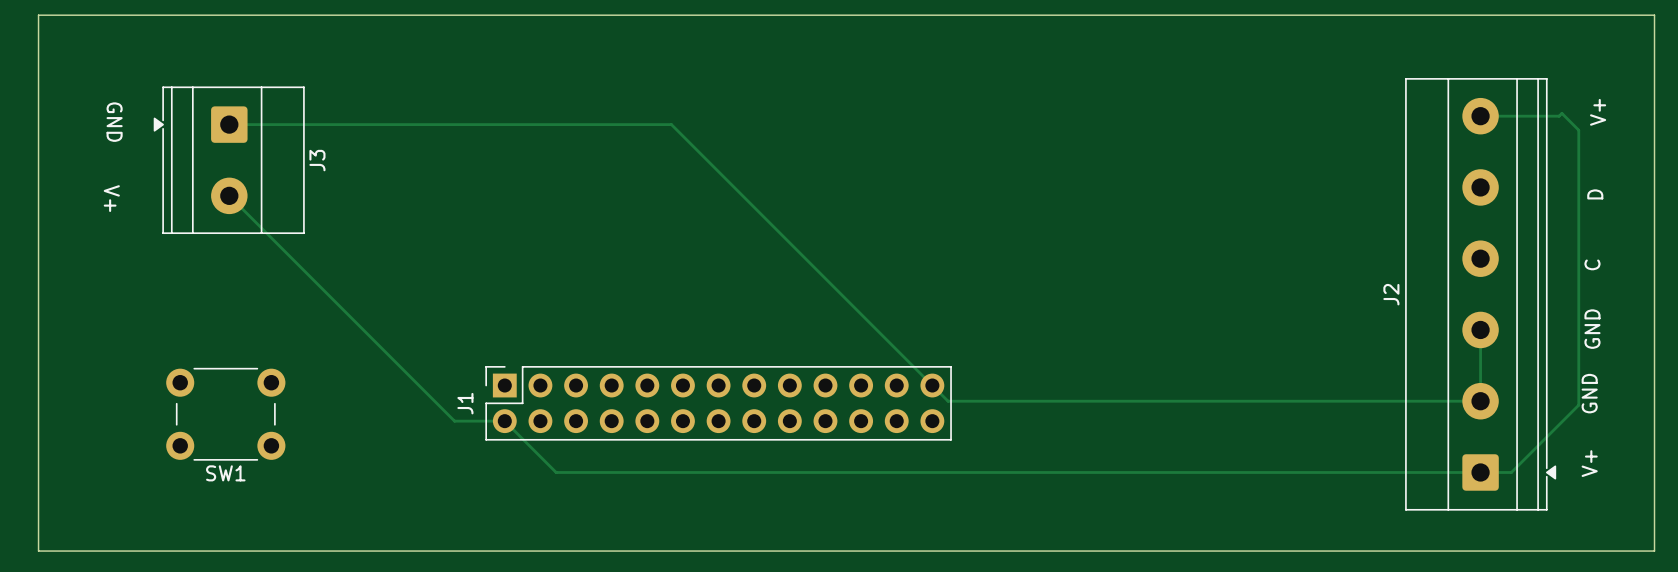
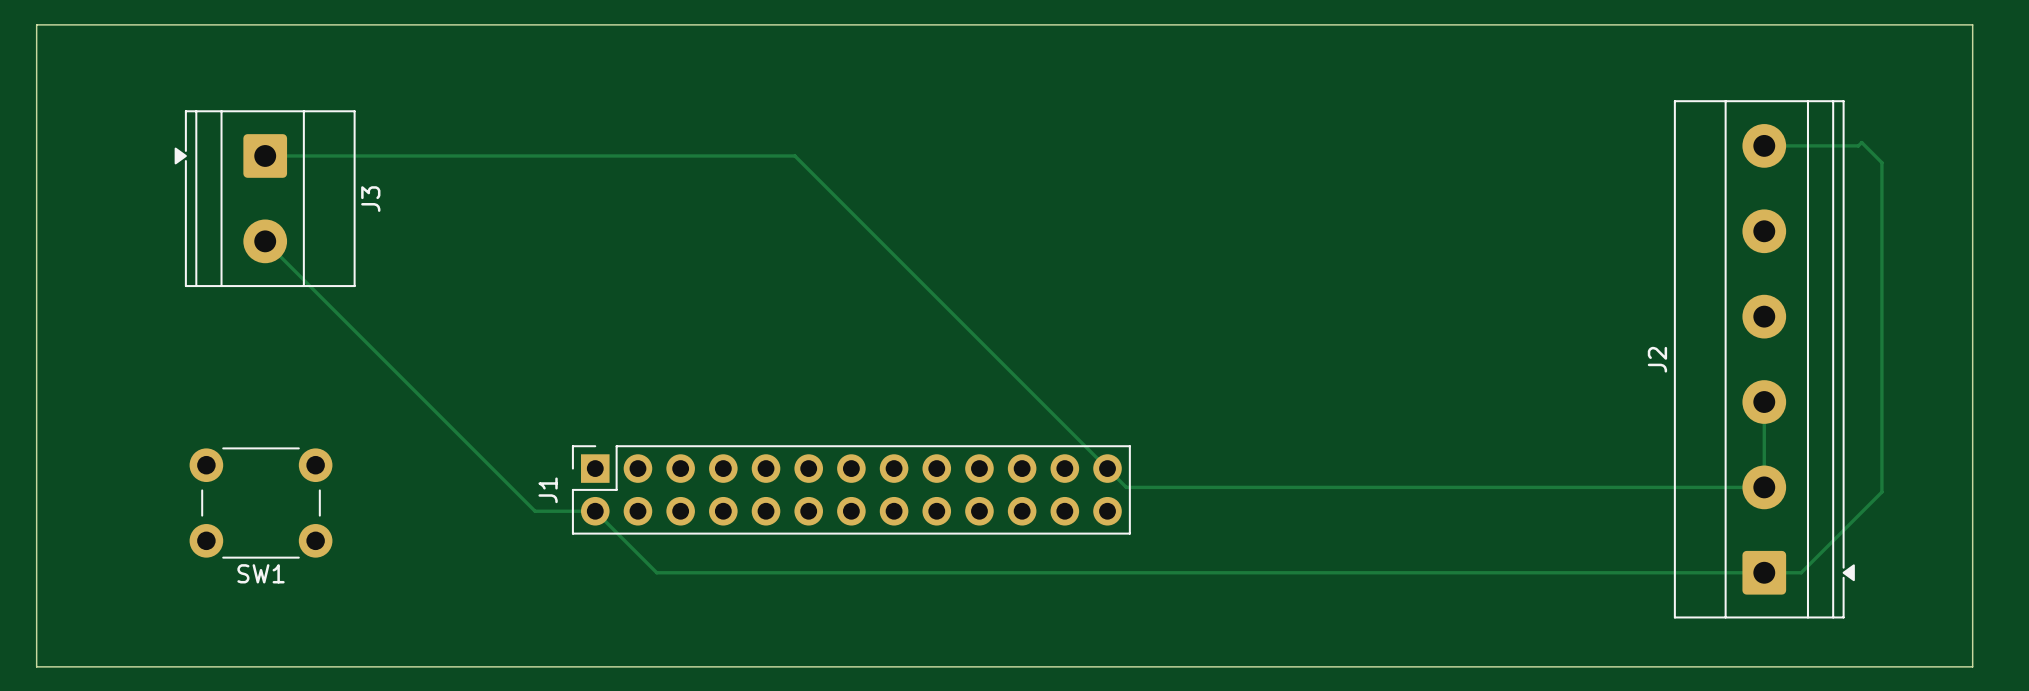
text: V+ (1598, 112) -> none
text: GND (114, 122) -> none
text: D (1595, 194) -> none
text: V+ (111, 198) -> none
text: C (1592, 264) -> none
text: GND (1592, 329) -> none
text: GND (1589, 393) -> none
text: V+ (1589, 463) -> none

